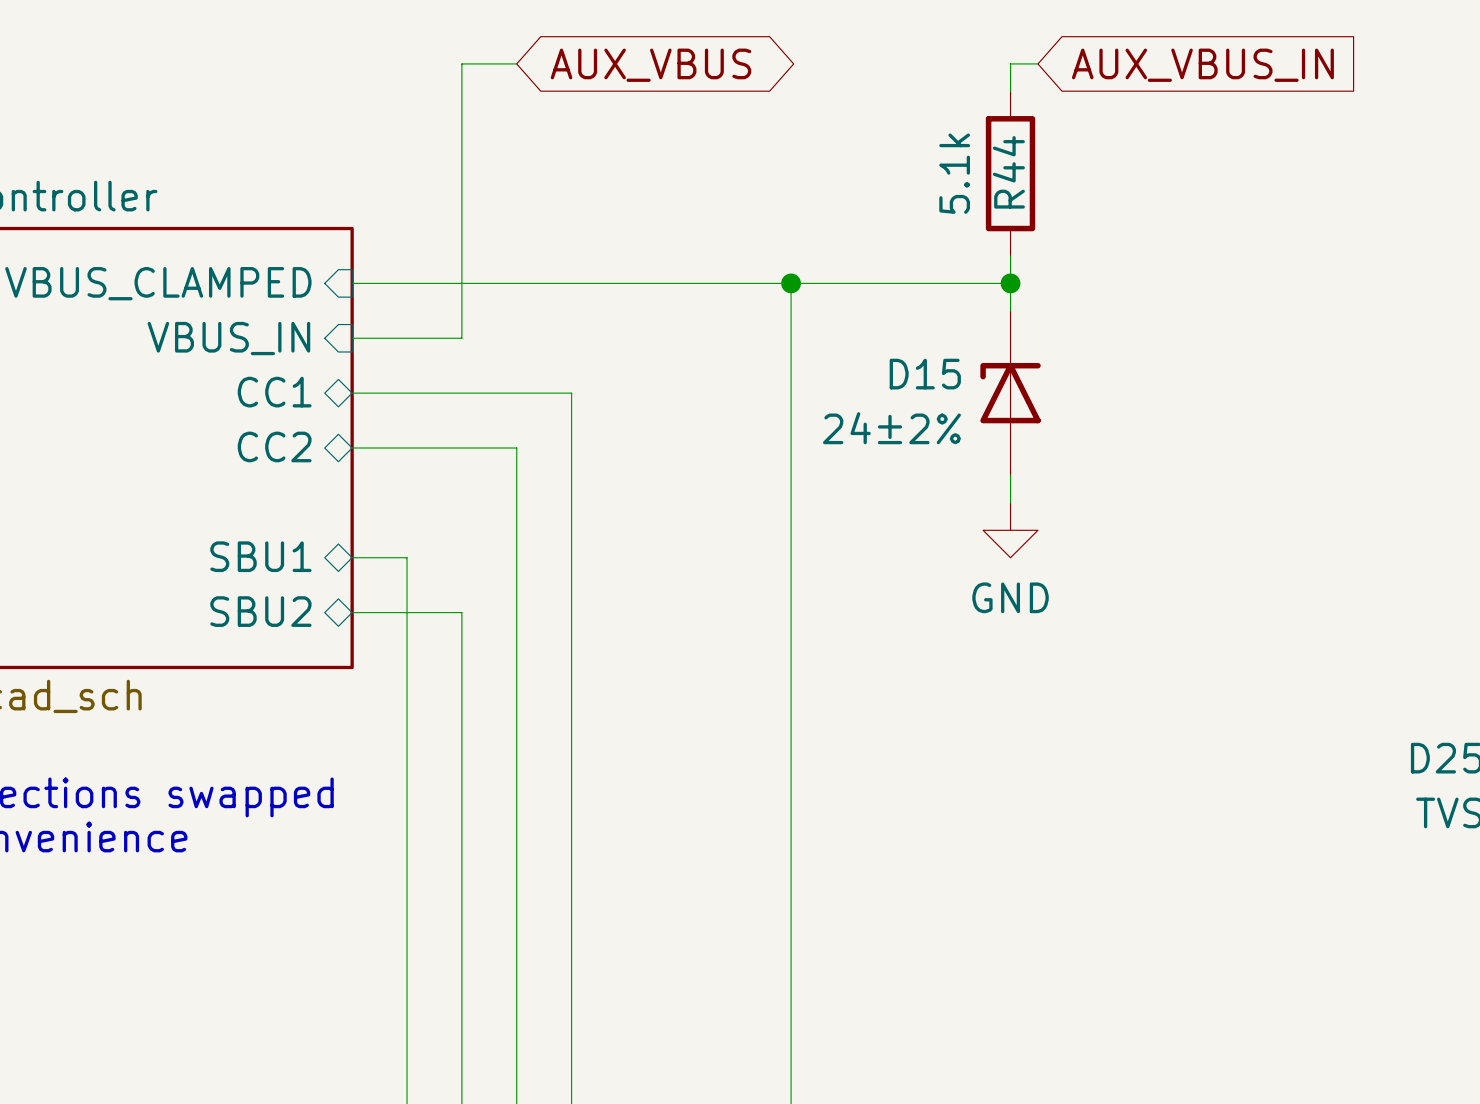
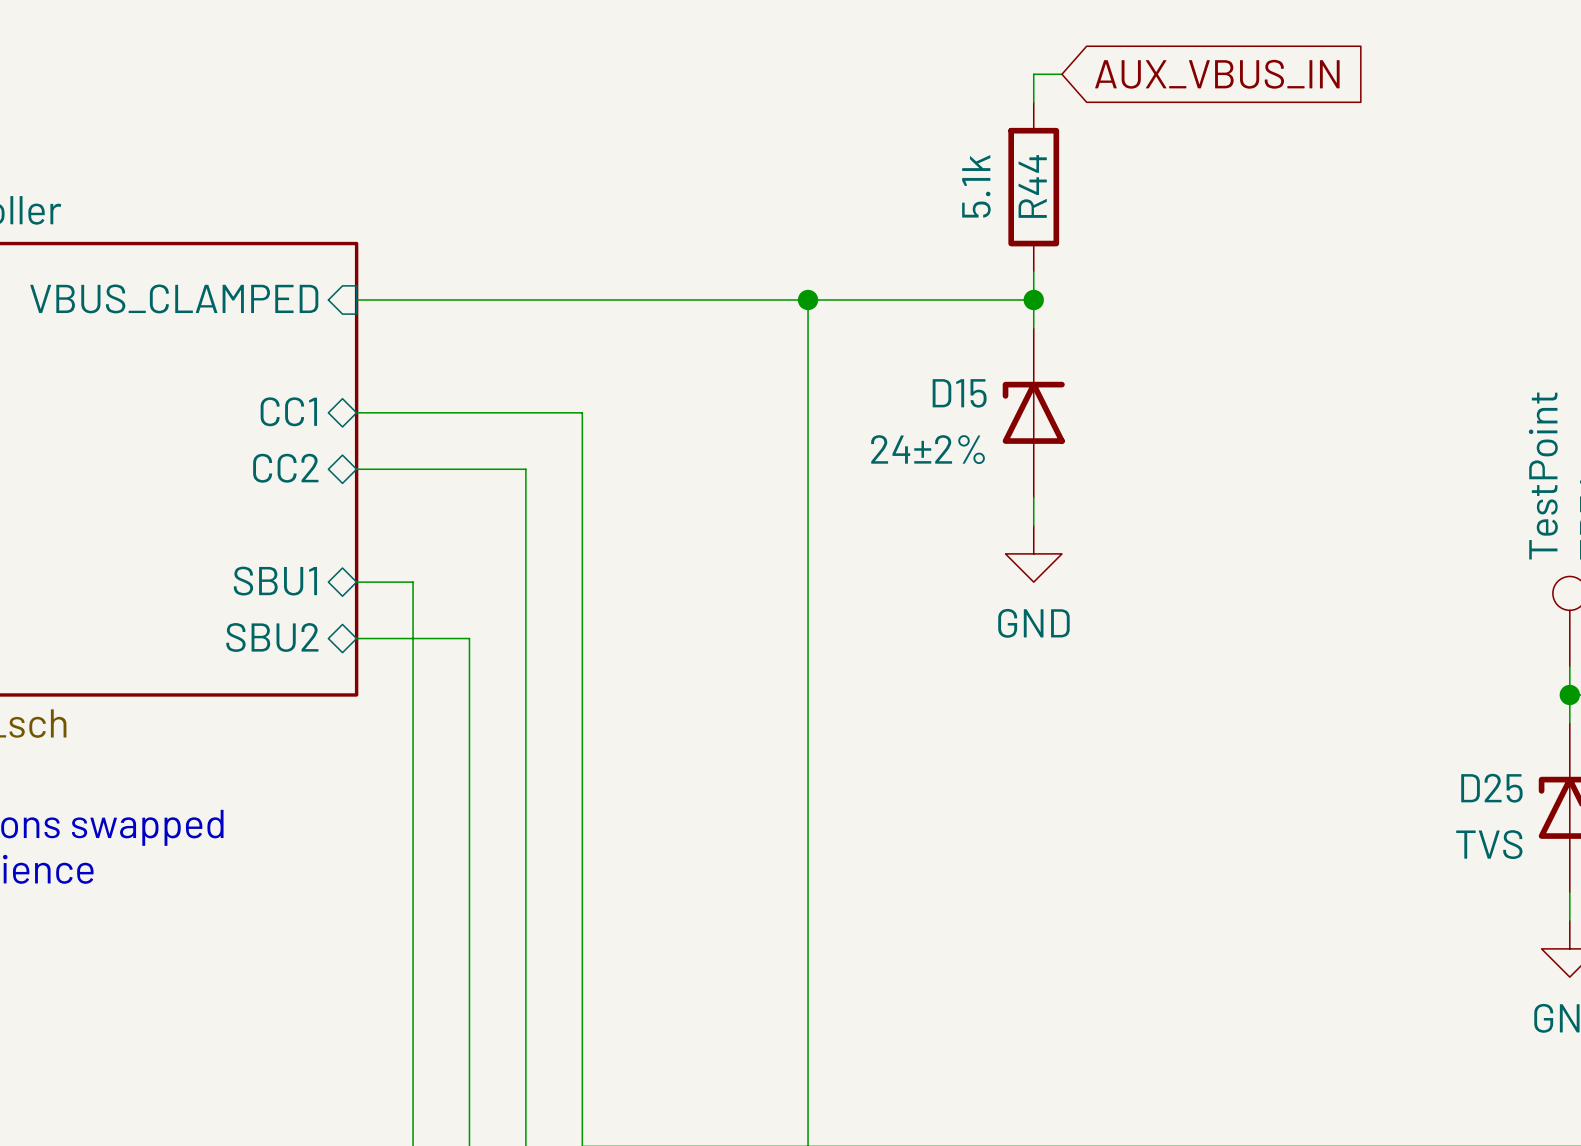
wire: (516, 63) (461, 63) (461, 338) (352, 338) -> none
global label: AUX_VBUS (651, 65) -> none
sheet pin: VBUS_IN (228, 338) -> none

